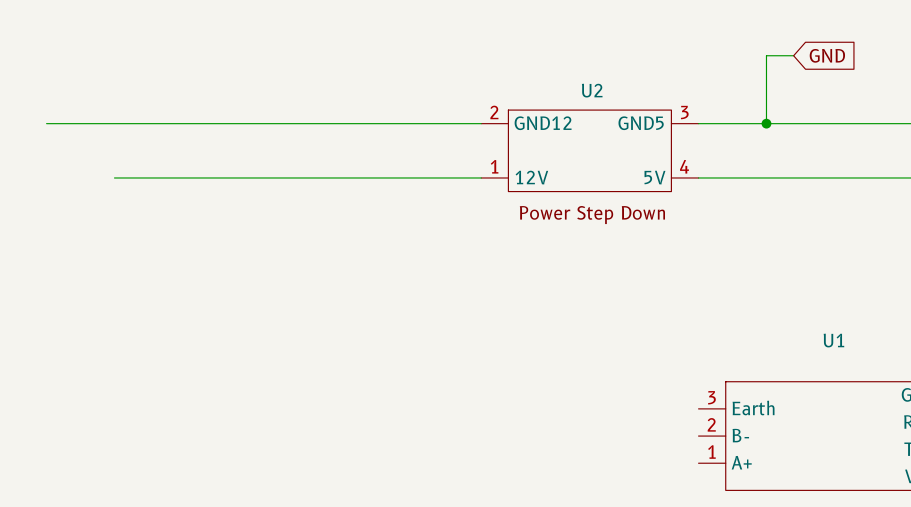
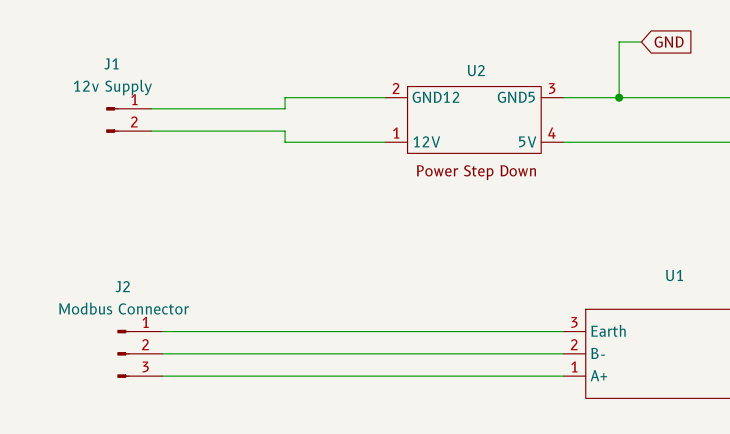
wire: (46, 123) (359, 123) -> (151, 108) (285, 108) (285, 97)
J1: none -> 12v Supply (128, 119)
wire: (114, 177) (359, 177) -> (151, 131) (285, 131) (285, 142)
wire: none -> (162, 331) (563, 331)
J2: none -> Modbus Connector (139, 353)
wire: none -> (162, 353) (563, 353)
wire: none -> (162, 376) (563, 376)

